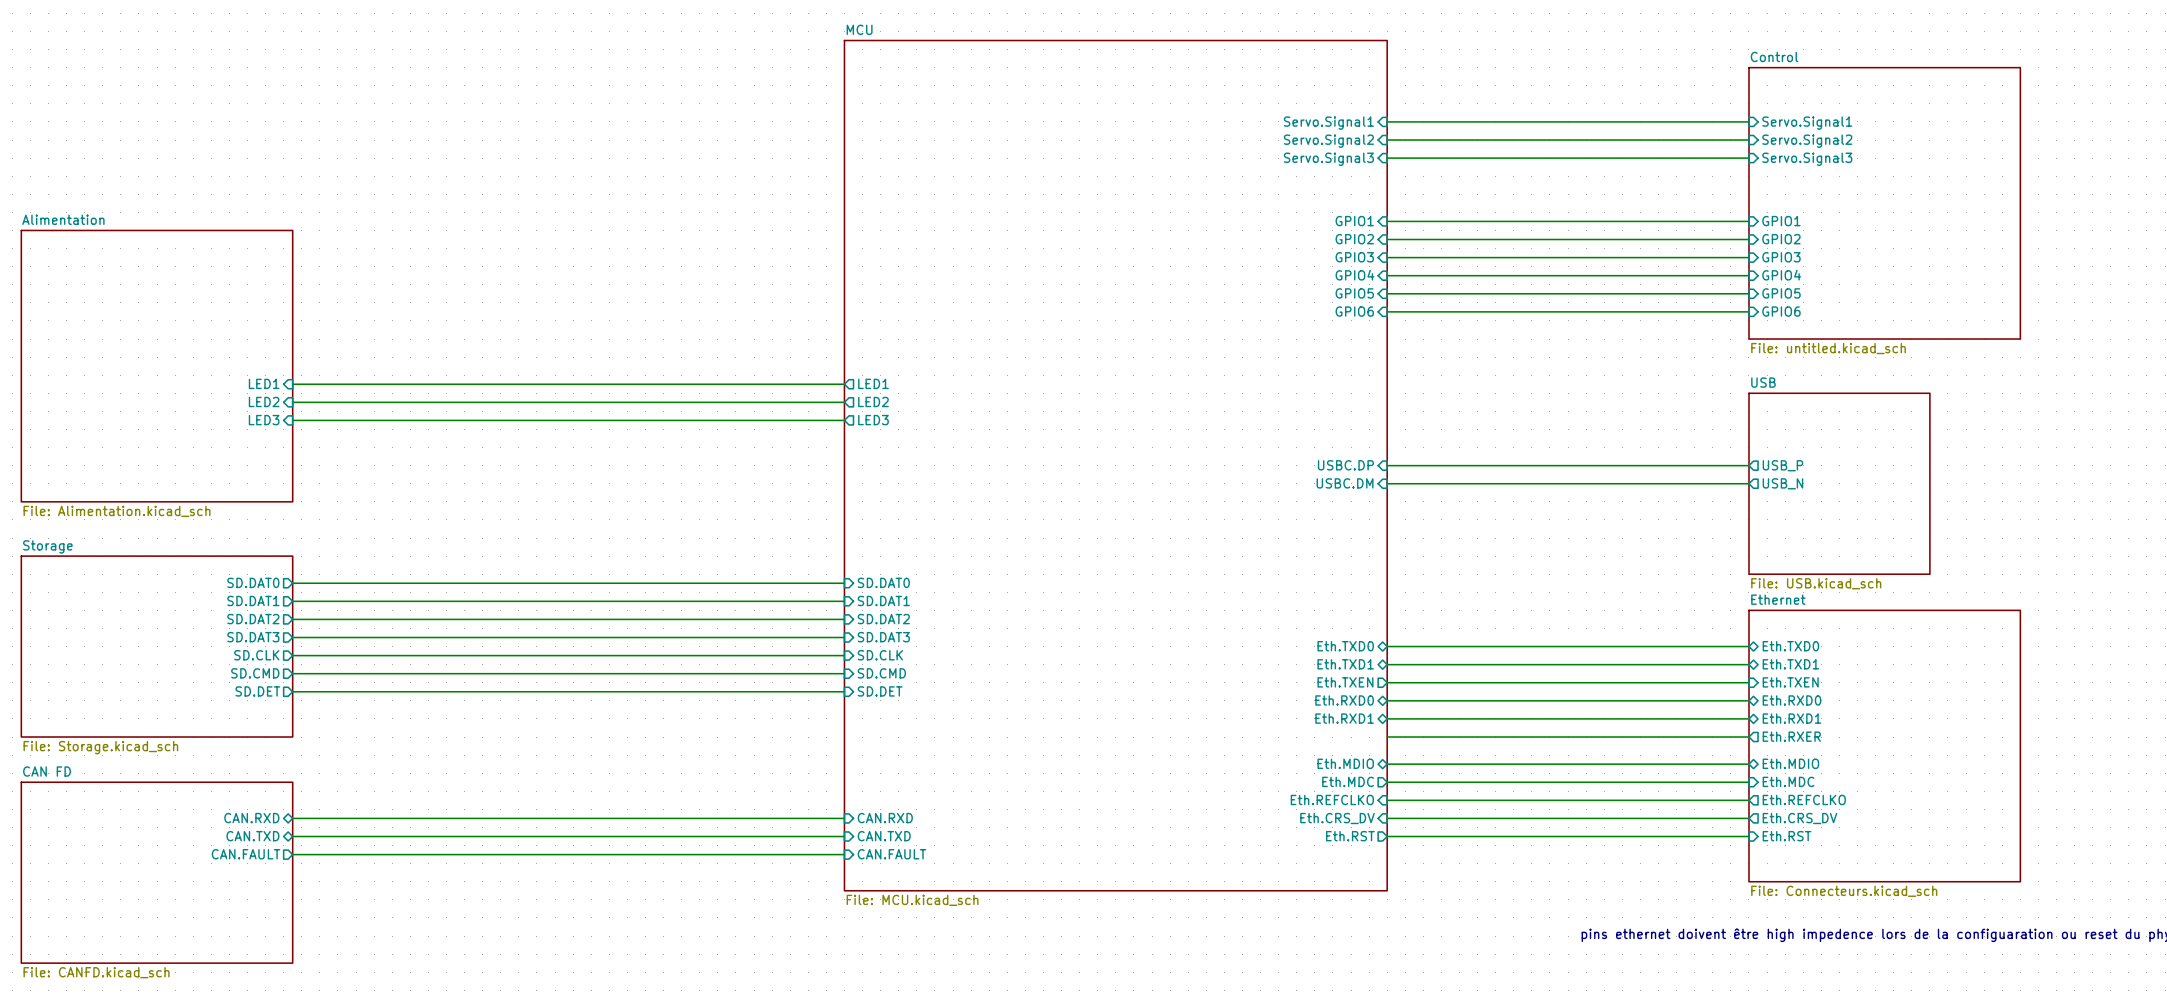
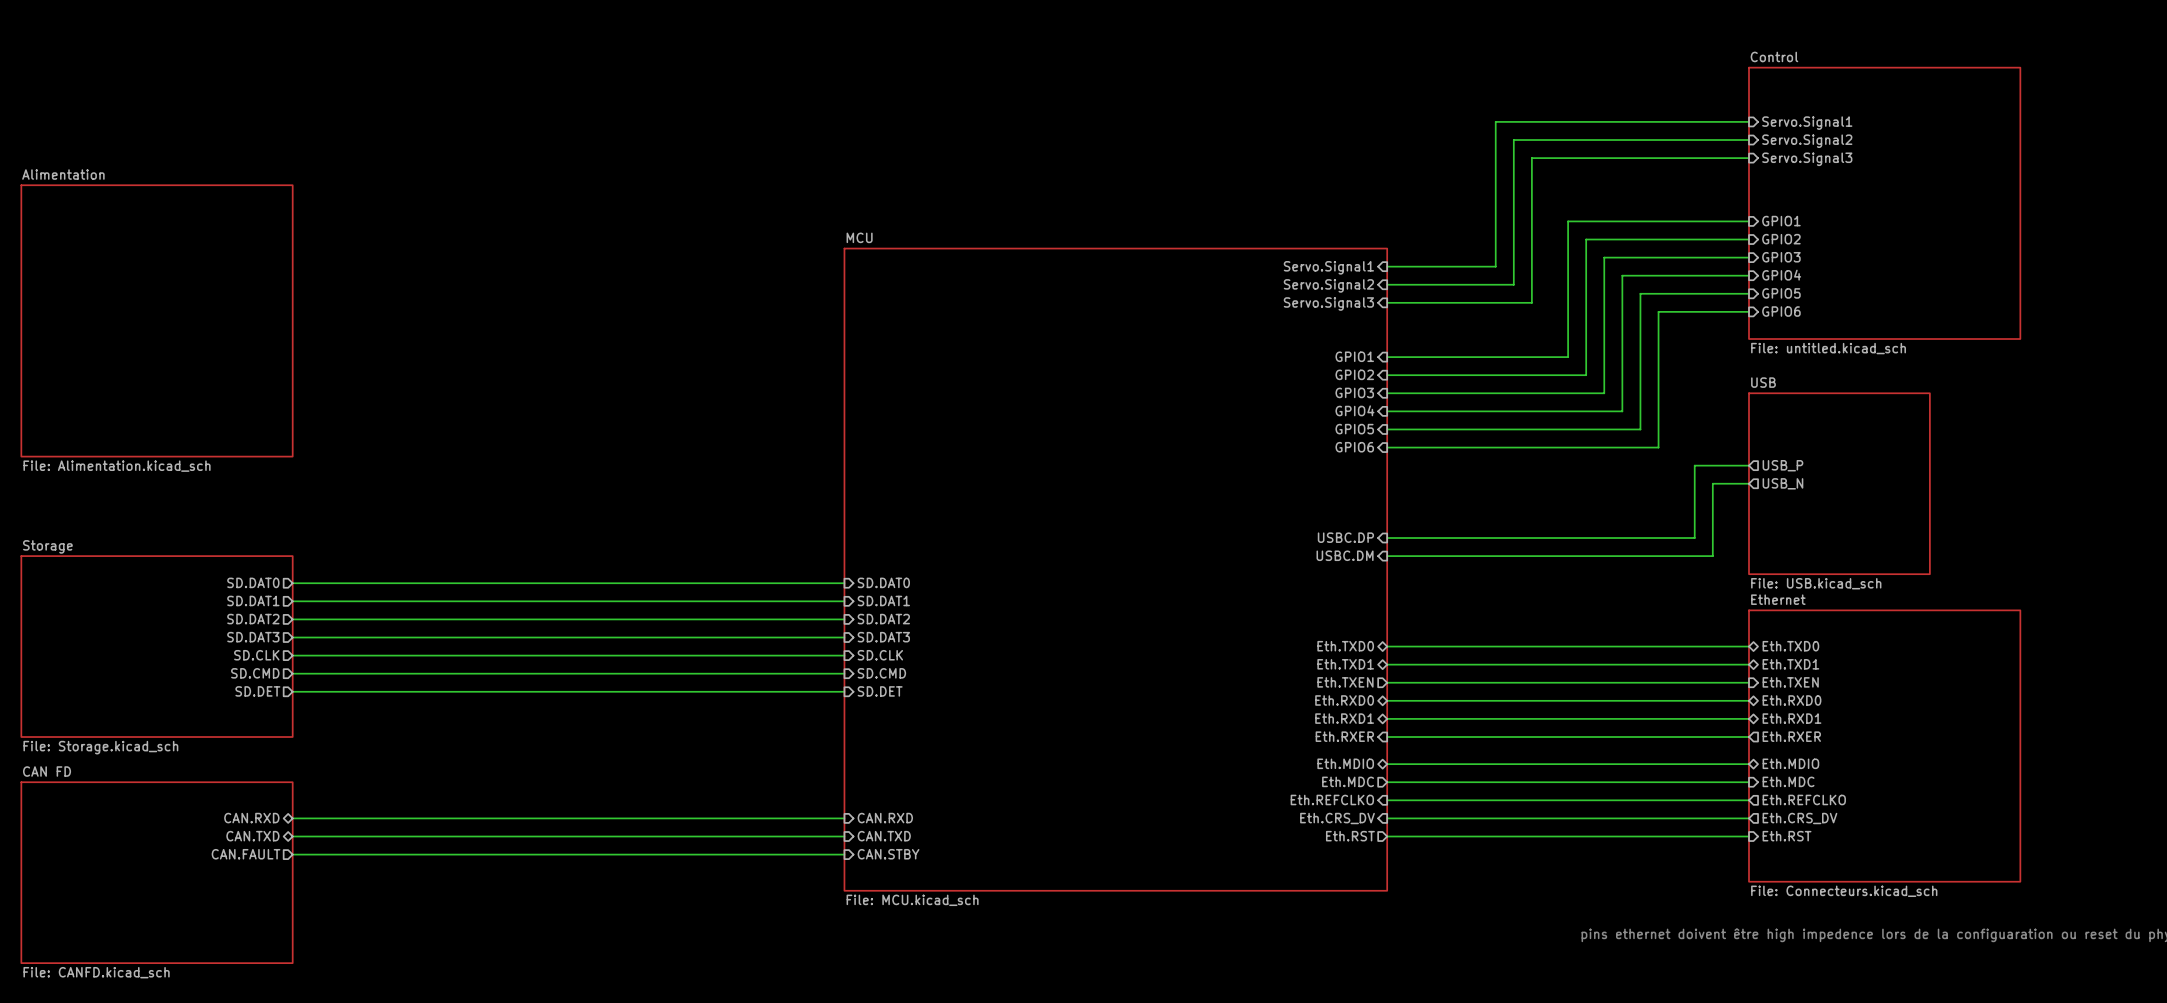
wire: (1387, 121) (1495, 121) -> (1387, 266) (1495, 266) (1495, 121)
sheet pin position: Servo.Signal1 (1328, 123) -> Servo.Signal1 (1328, 267)
wire: (1387, 140) (1513, 140) -> (1387, 284) (1513, 284) (1513, 140)
sheet pin position: Servo.Signal2 (1328, 141) -> Servo.Signal2 (1328, 285)
wire: (1387, 158) (1531, 158) -> (1387, 302) (1531, 302) (1531, 158)
sheet pin position: Servo.Signal3 (1328, 159) -> Servo.Signal3 (1328, 303)
sheet pin position: GPIO1 (1354, 221) -> GPIO1 (1354, 356)
wire: (1387, 221) (1568, 221) -> (1387, 357) (1568, 357) (1568, 221)
sheet pin position: GPIO2 (1354, 239) -> GPIO2 (1354, 374)
wire: (1387, 239) (1586, 239) -> (1387, 375) (1586, 375) (1586, 239)
sheet pin position: GPIO3 (1354, 257) -> GPIO3 (1354, 392)
wire: (1387, 257) (1604, 257) -> (1387, 393) (1604, 393) (1604, 257)
sheet pin position: GPIO4 (1354, 275) -> GPIO4 (1354, 410)
wire: (1387, 275) (1622, 275) -> (1387, 411) (1622, 411) (1622, 275)
sheet pin position: GPIO5 (1354, 293) -> GPIO5 (1354, 429)
wire: (1387, 293) (1640, 293) -> (1387, 429) (1640, 429) (1640, 293)
sheet pin position: GPIO6 (1354, 311) -> GPIO6 (1354, 447)
wire: (1387, 311) (1658, 311) -> (1387, 447) (1658, 447) (1658, 311)
sheet Alimentation position: (157, 366) -> (157, 320)
sheet pin: LED1 (264, 383) -> none
sheet pin: LED1 (873, 383) -> none
wire: (292, 384) (844, 384) -> none
sheet pin: LED2 (264, 401) -> none
sheet pin: LED2 (873, 401) -> none
wire: (292, 402) (844, 402) -> none
sheet pin: LED3 (264, 420) -> none
wire: (292, 420) (844, 420) -> none
sheet pin: LED3 (873, 420) -> none
sheet MCU: File: MCU.kicad_sch (1115, 465) -> none
sheet pin position: USBC.DP (1345, 465) -> USBC.DP (1345, 537)
wire: (1387, 465) (1694, 465) -> (1387, 538) (1694, 538) (1694, 465)
sheet pin position: USBC.DM (1345, 483) -> USBC.DM (1345, 555)
wire: (1387, 483) (1712, 483) -> (1387, 556) (1712, 556) (1712, 483)
sheet MCU: none -> File: MCU.kicad_sch (1115, 569)
sheet pin: none -> Eth.RXER (1344, 736)
sheet pin: CAN.FAULT (891, 854) -> CAN.STBY (888, 854)

